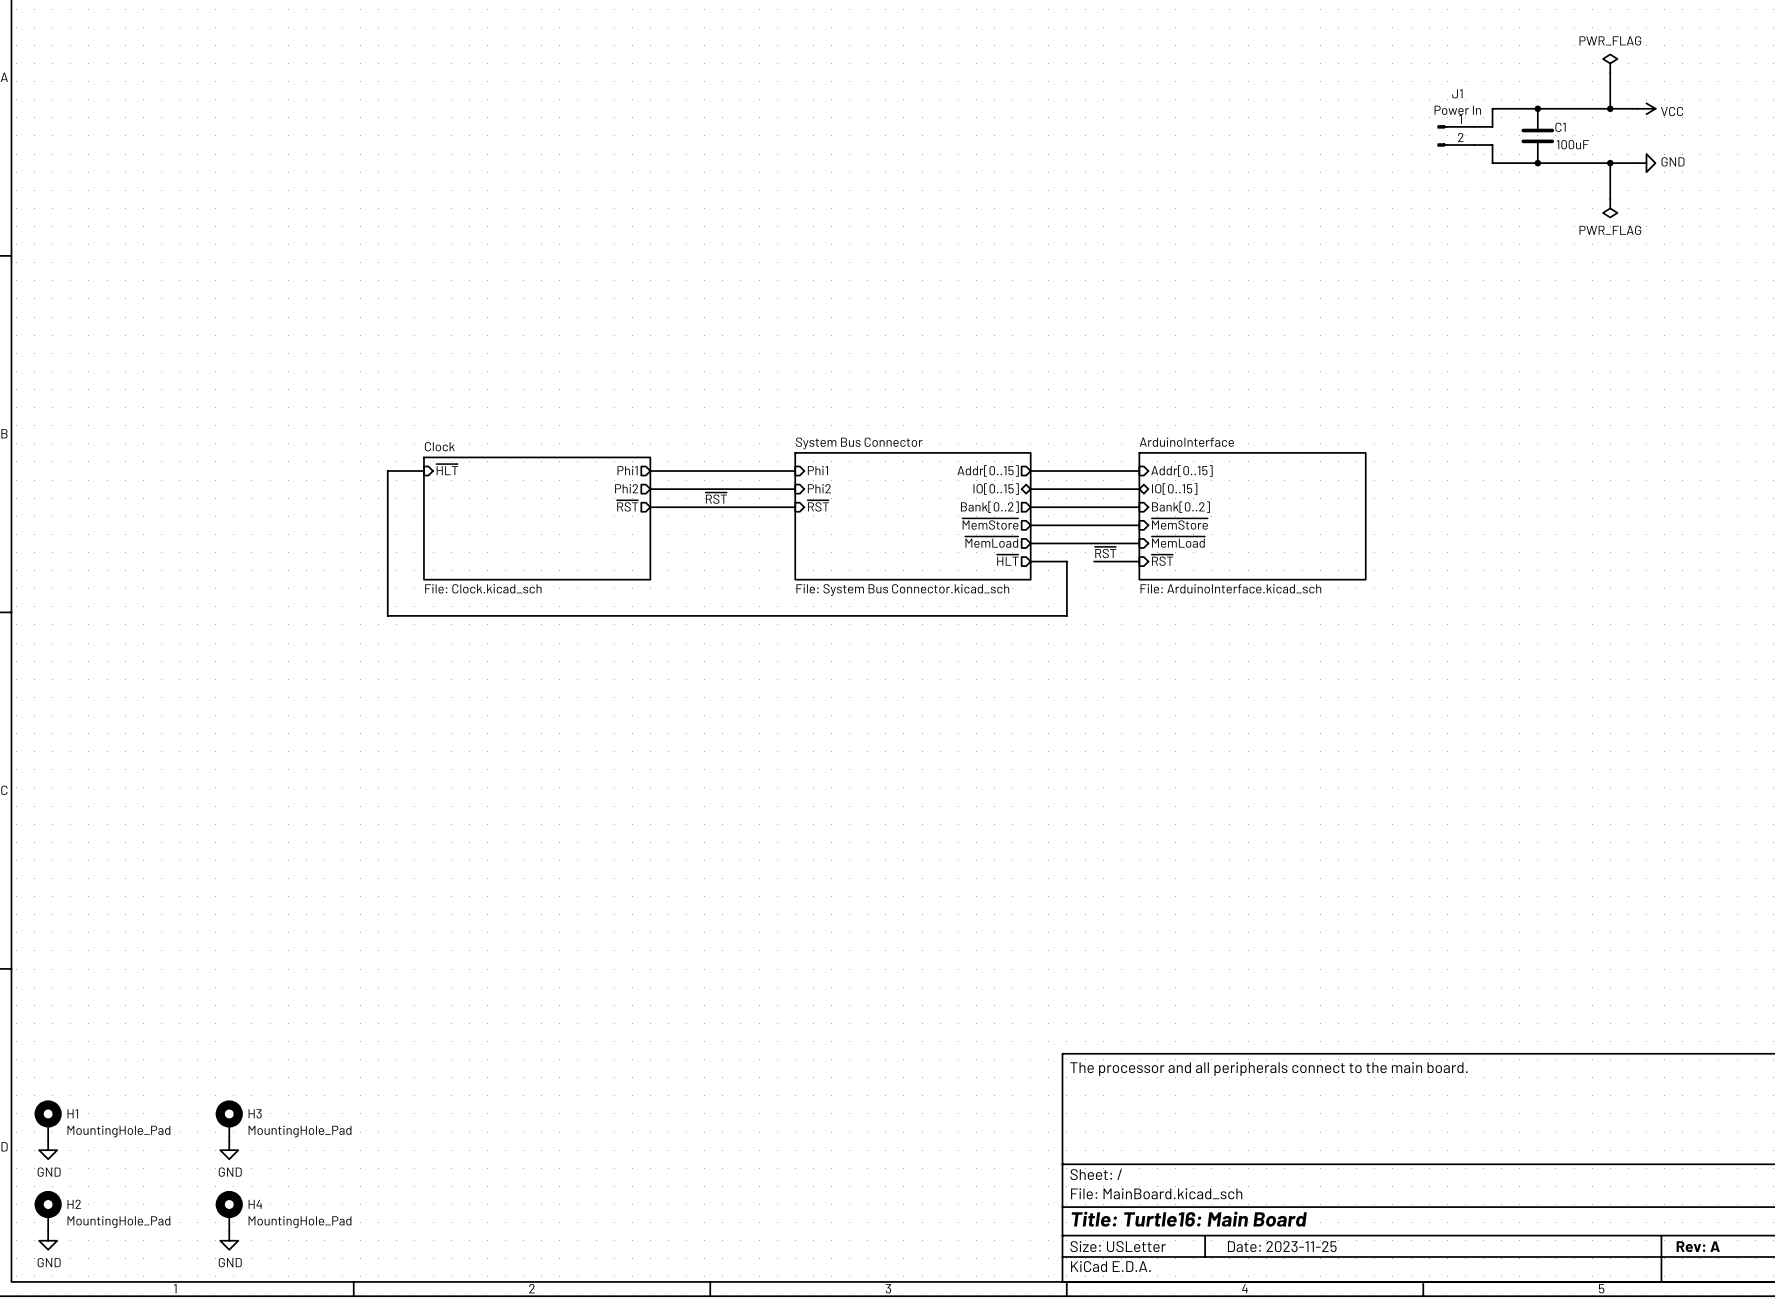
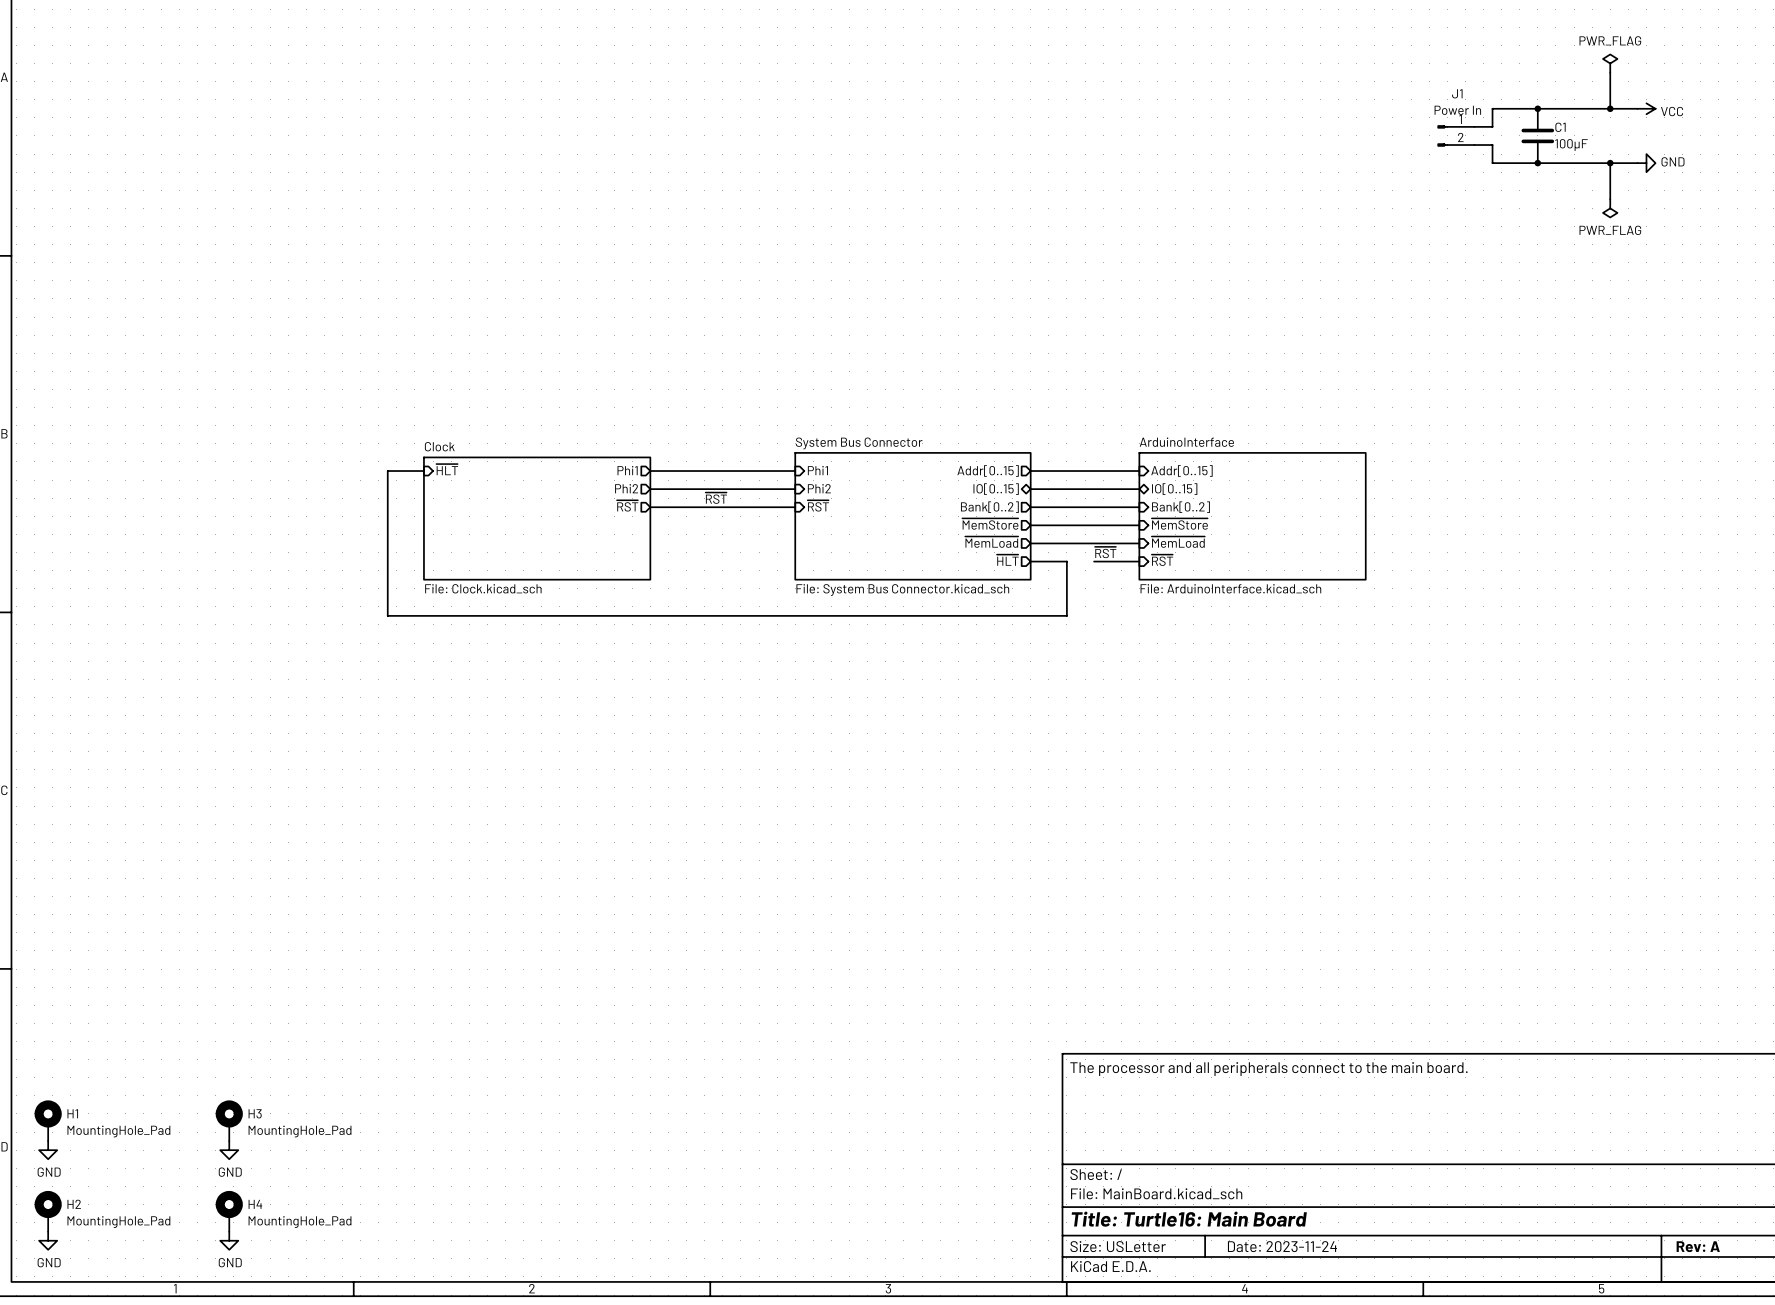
C1 value: 100uF (1572, 144) -> 100µF (1571, 145)
title block: Date: 2023-11-25 (1282, 1246) -> Date: 2023-11-24 (1282, 1246)

